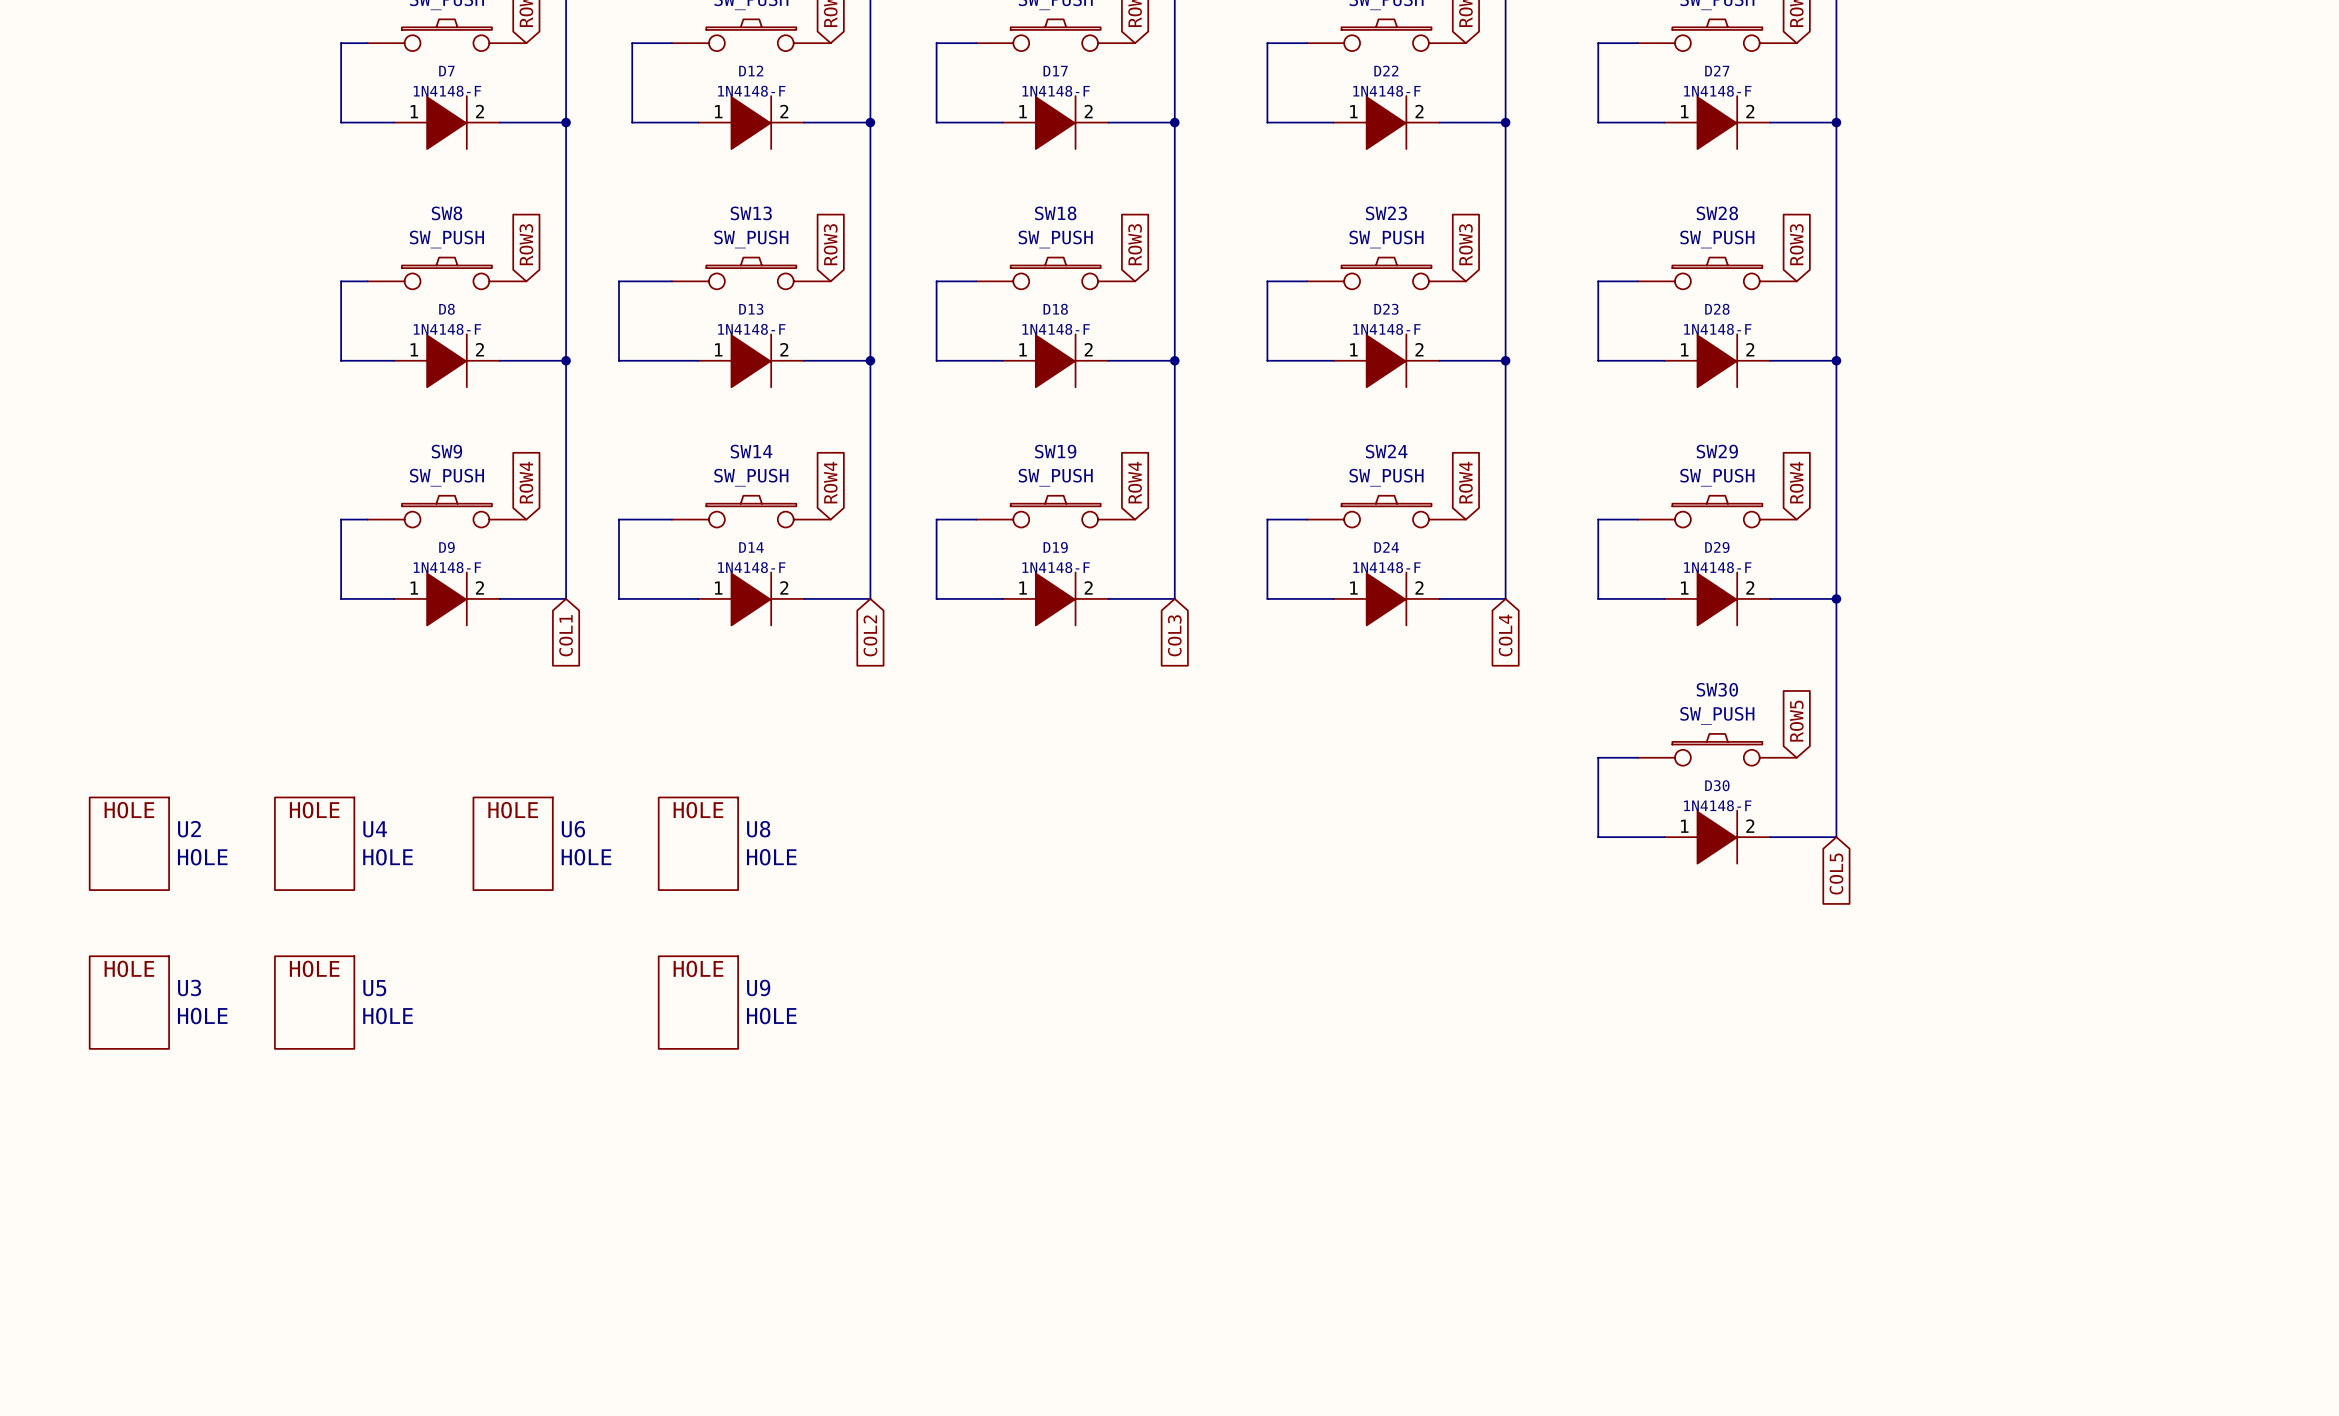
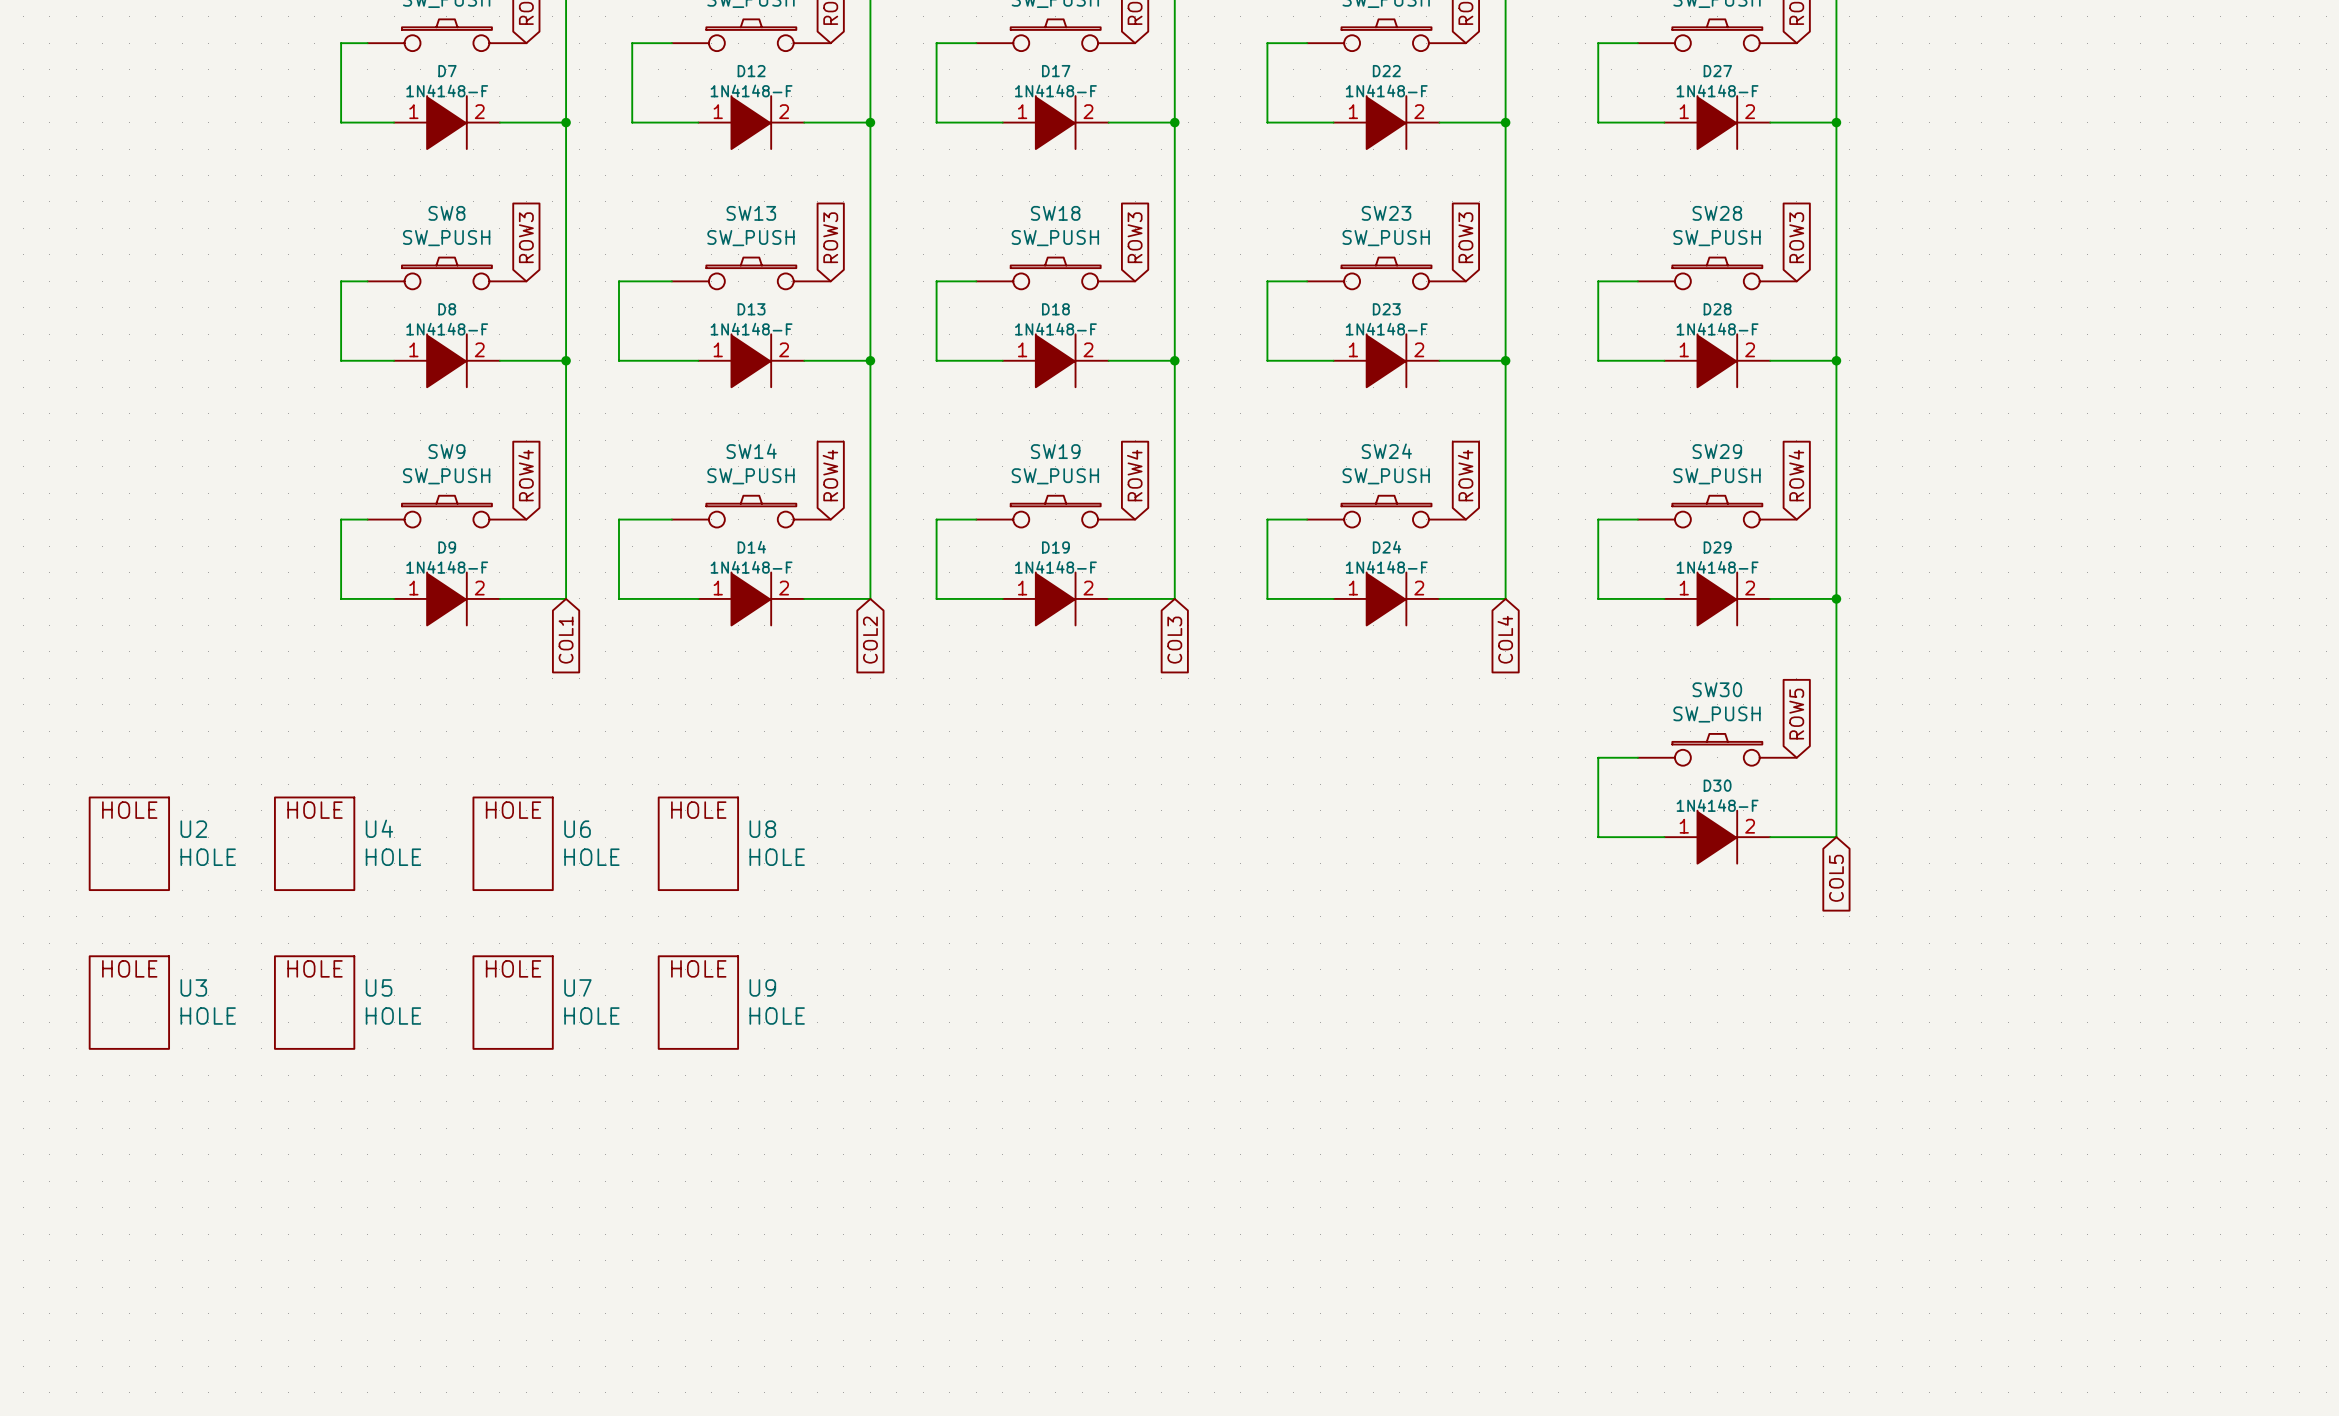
U7: none -> HOLE (513, 1002)

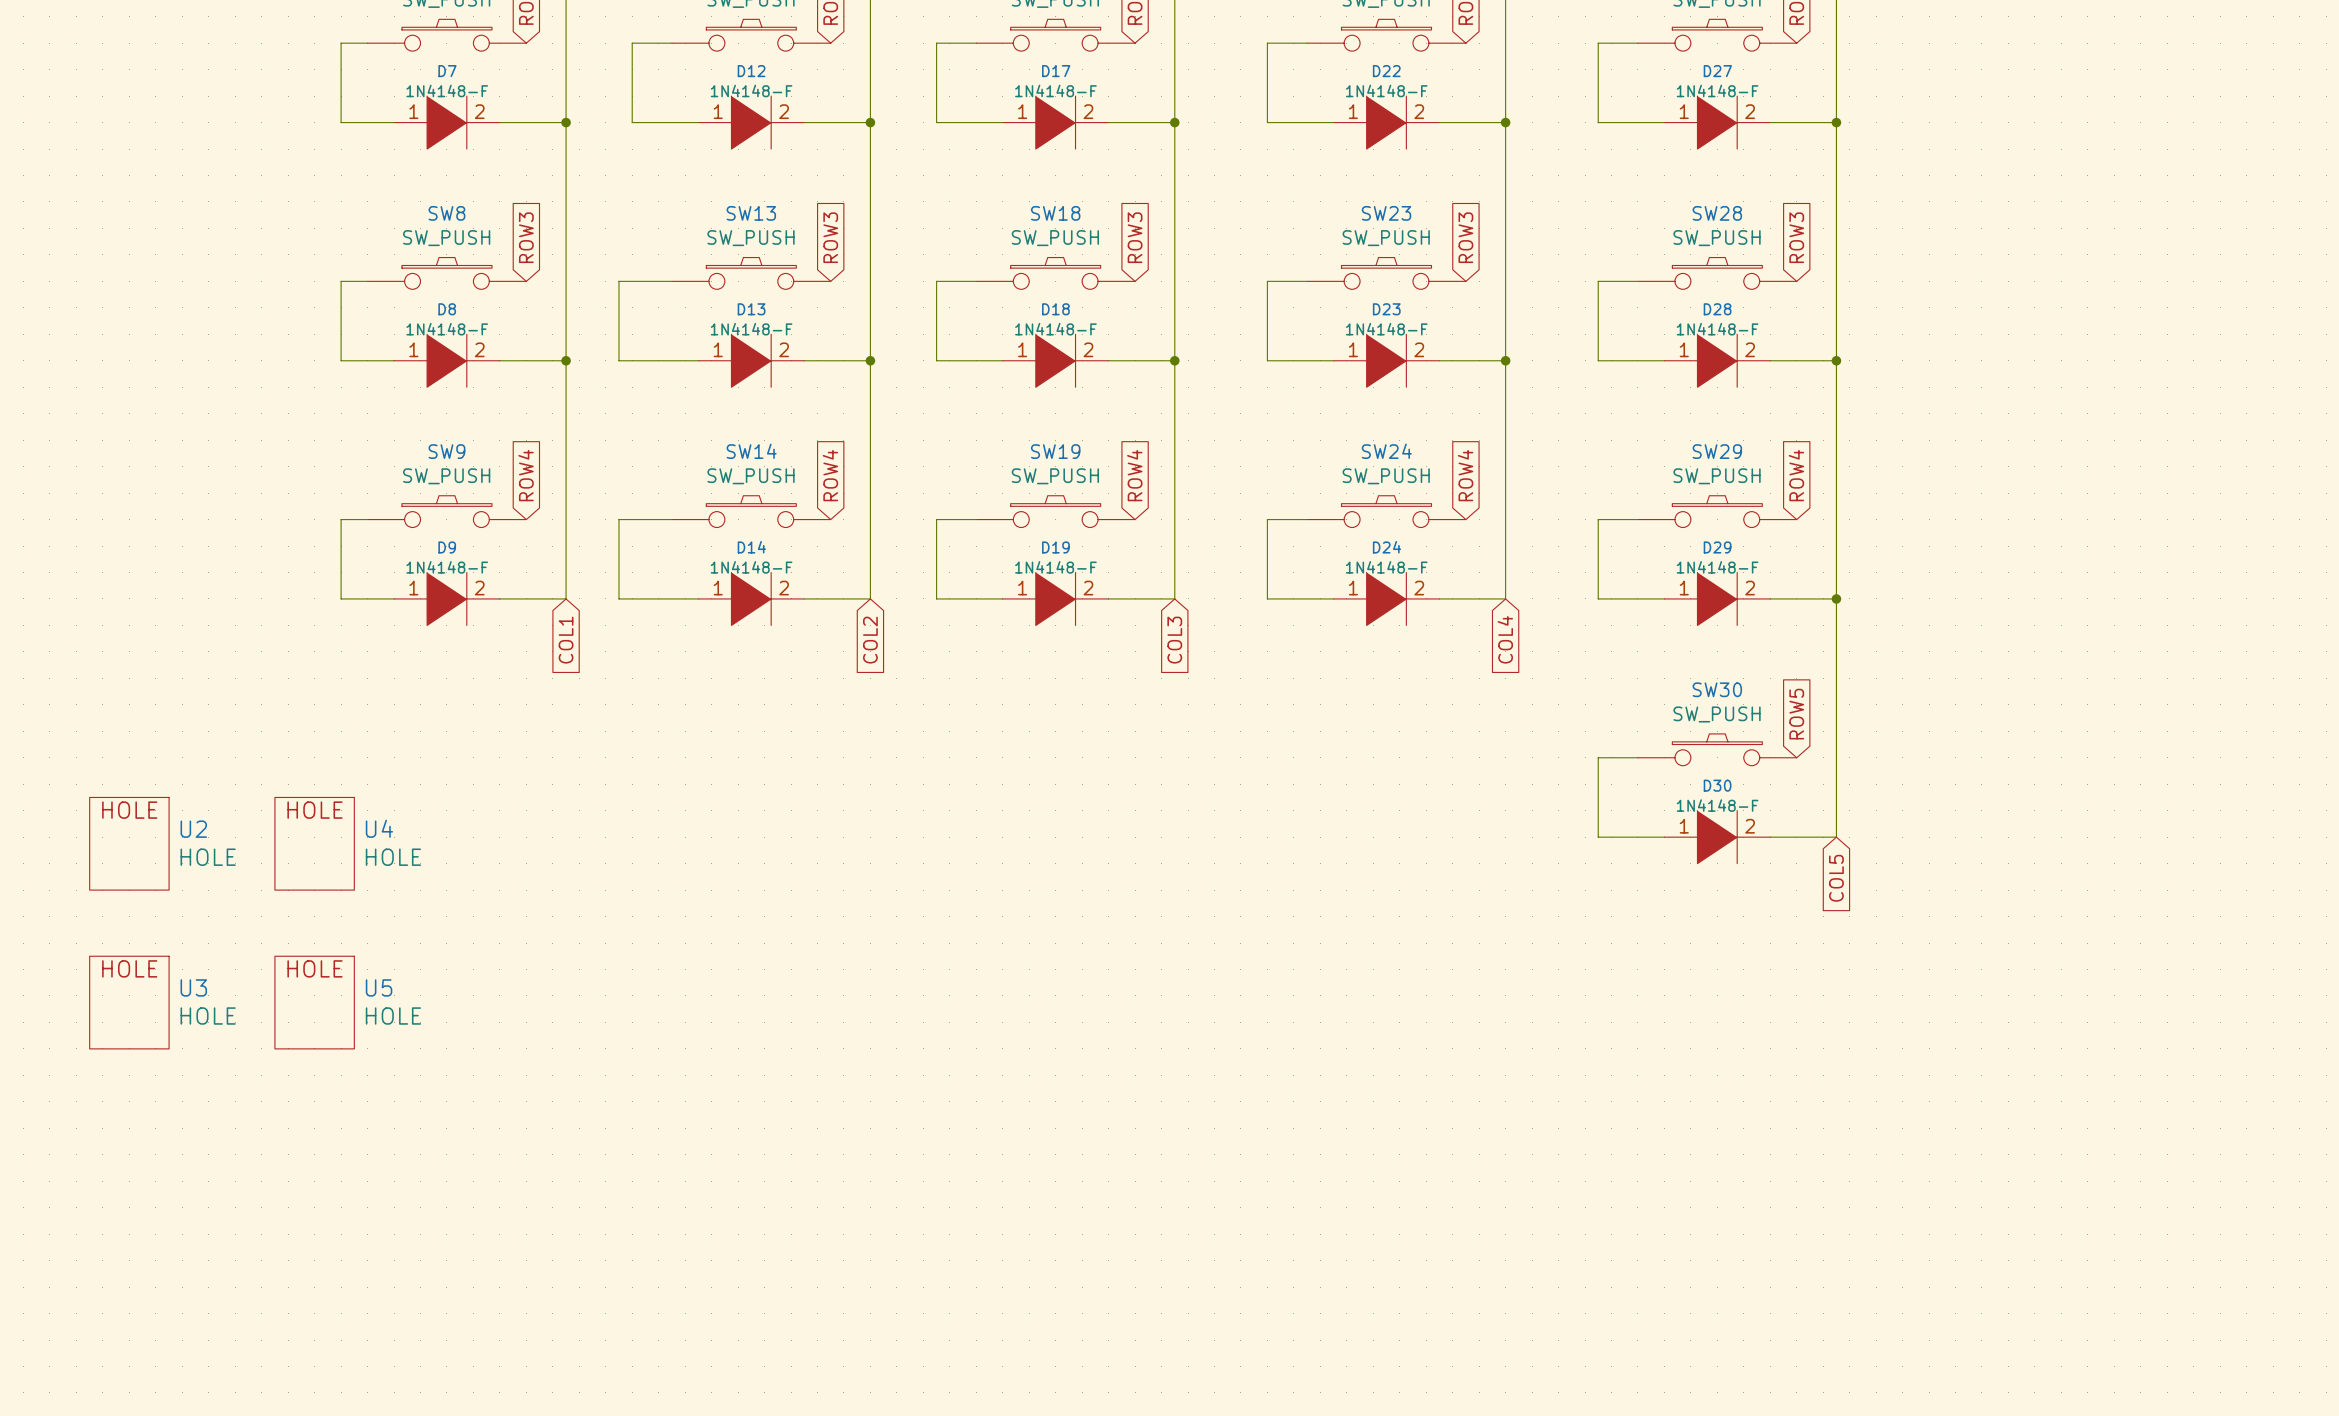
U6: HOLE (513, 843) -> none
U8: HOLE (698, 843) -> none
U7: HOLE (513, 1002) -> none
U9: HOLE (698, 1002) -> none

